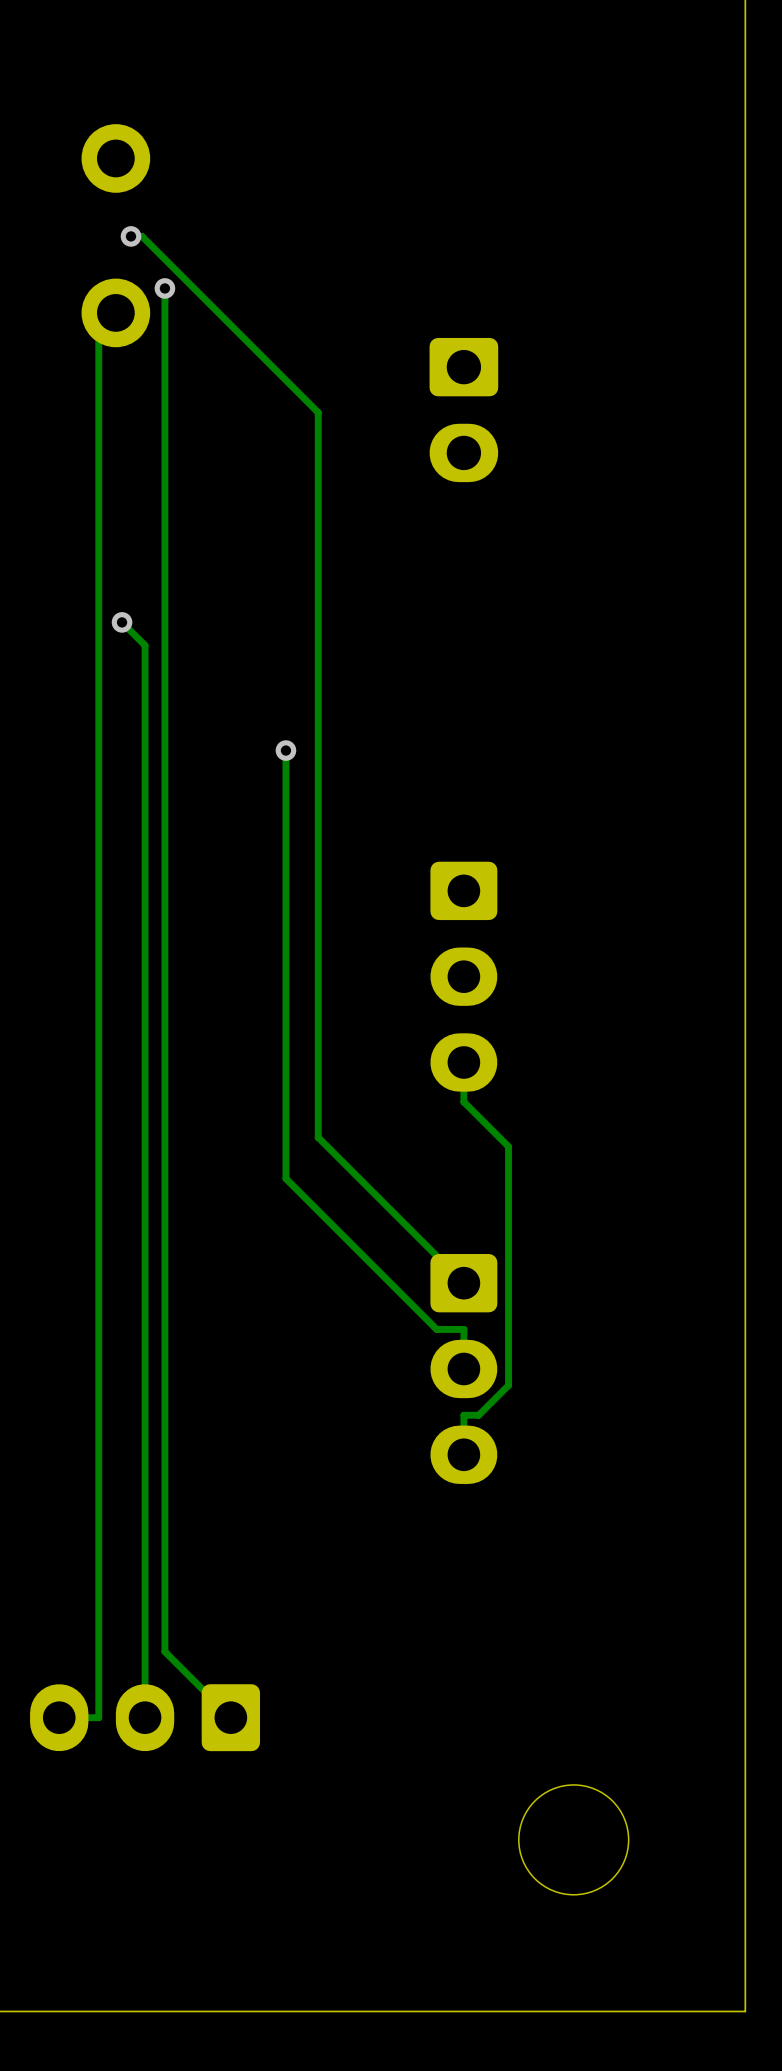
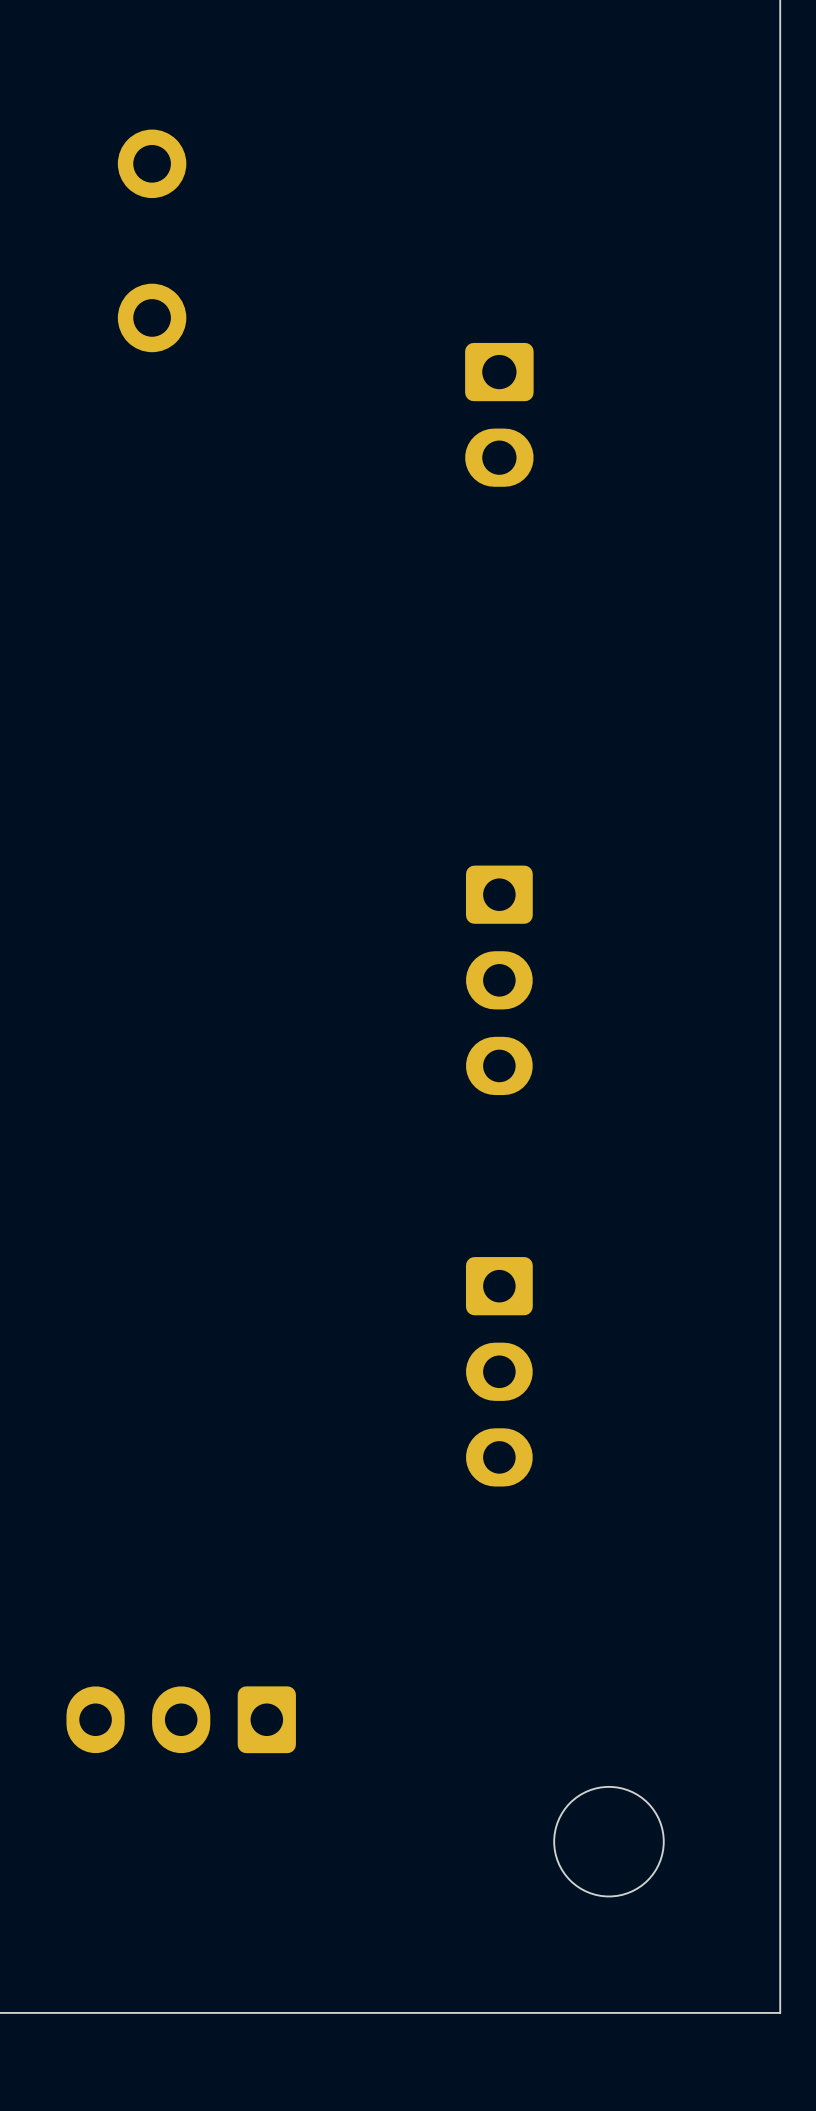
track: (131, 236) (142, 236) (318, 412) (318, 1137) (463, 1283) -> none
via: (131, 236) -> none
track: (164, 288) (164, 1651) (230, 1717) -> none
via: (164, 288) -> none
track: (115, 312) (98, 330) (98, 1717) (59, 1717) -> none
track: (122, 622) (145, 645) (145, 1717) -> none
via: (122, 622) -> none
track: (285, 750) (285, 1178) (436, 1329) (463, 1329) (463, 1368) -> none
via: (285, 750) -> none
track: (463, 1062) (463, 1102) (508, 1146) (508, 1385) (478, 1415) (463, 1415) (463, 1454) -> none

